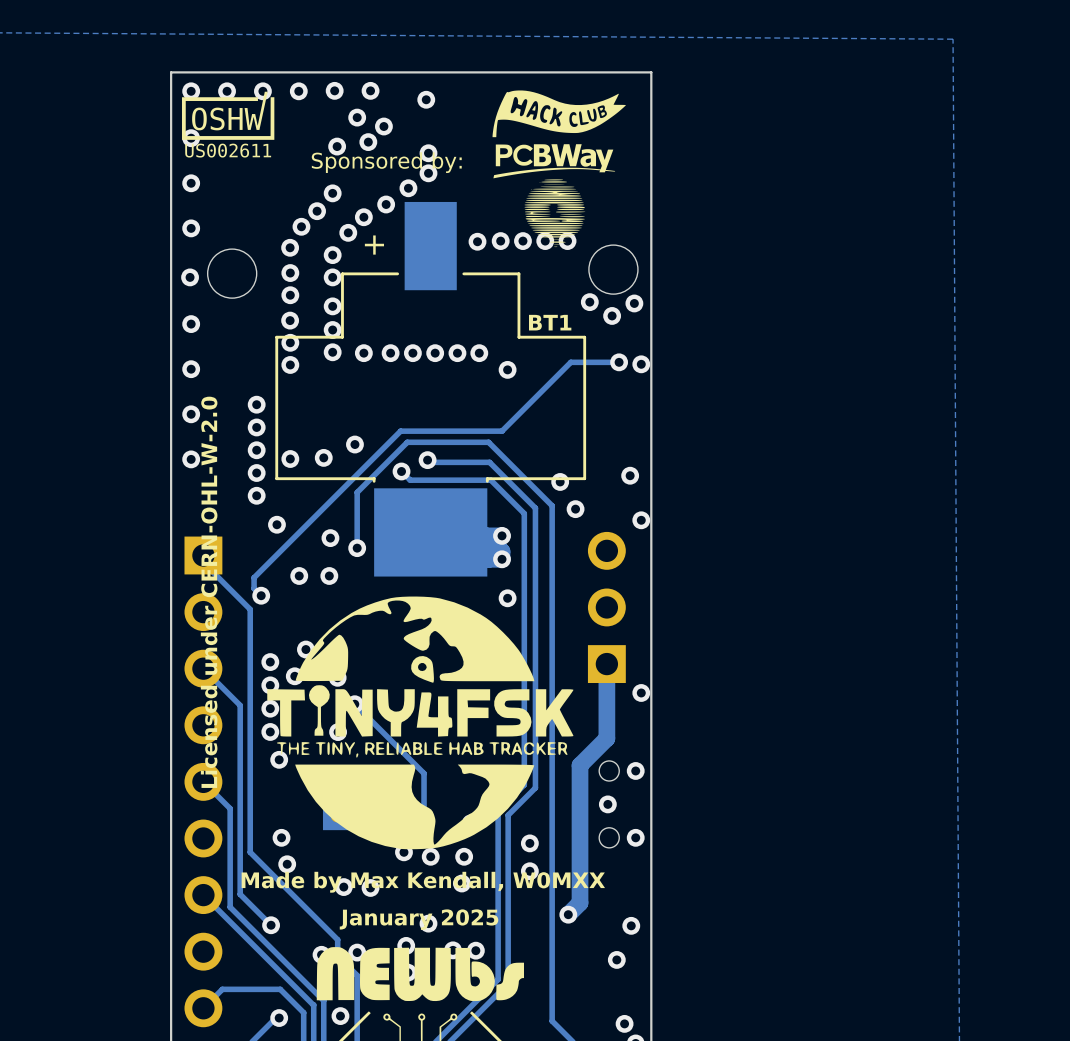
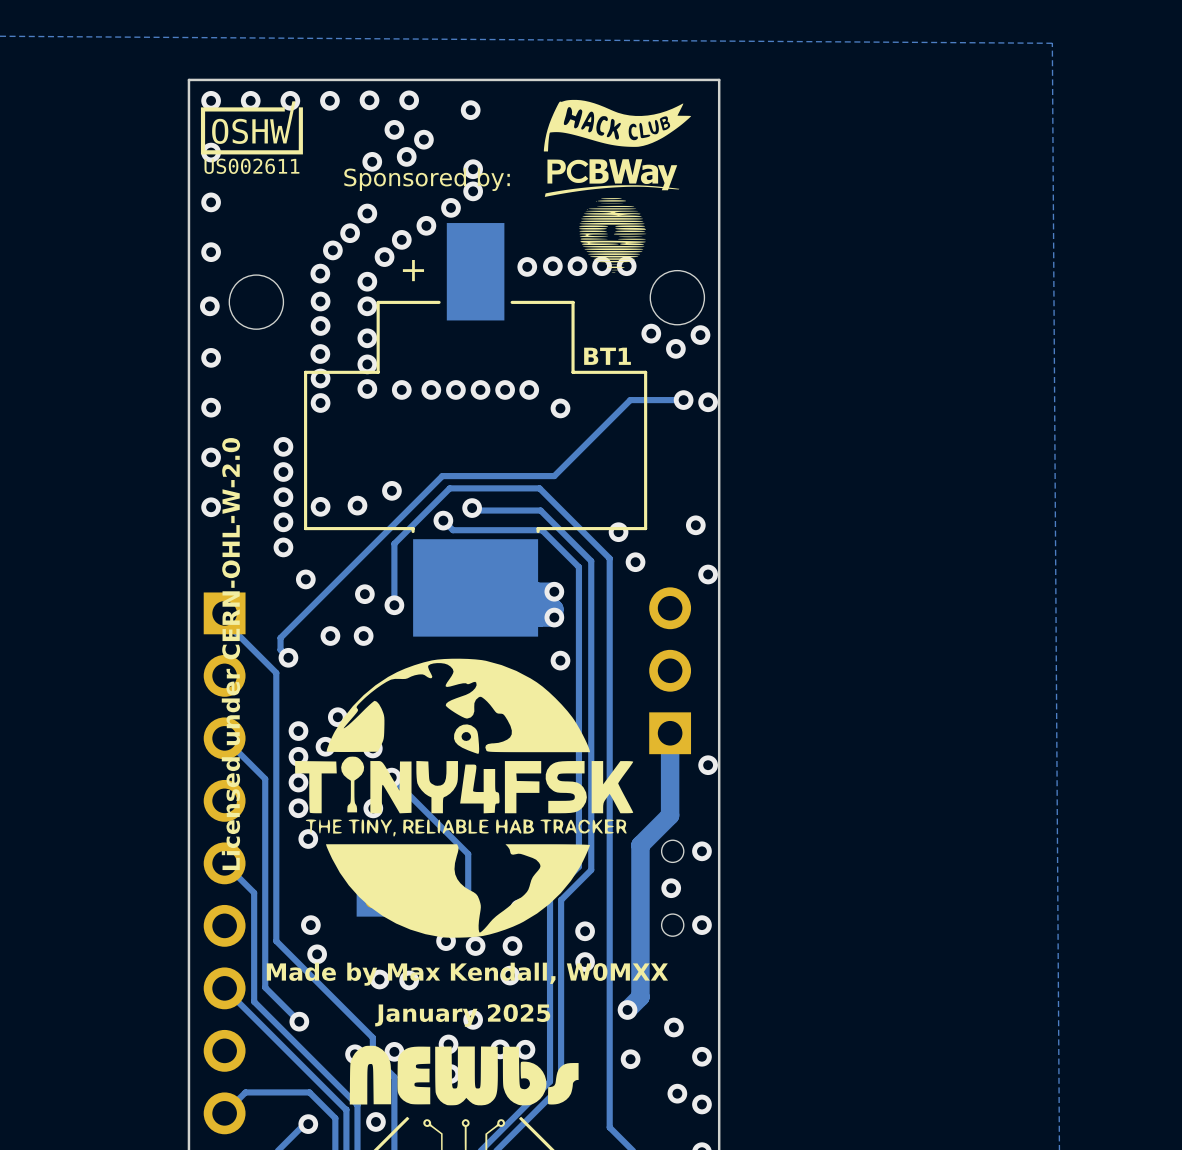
via: (631, 925) -> none
via: none -> (673, 1027)
via: none -> (701, 1056)
via: none -> (630, 1059)
via: (616, 959) -> none
via: none -> (677, 1093)
via: none -> (701, 1104)
via: (624, 1023) -> none

